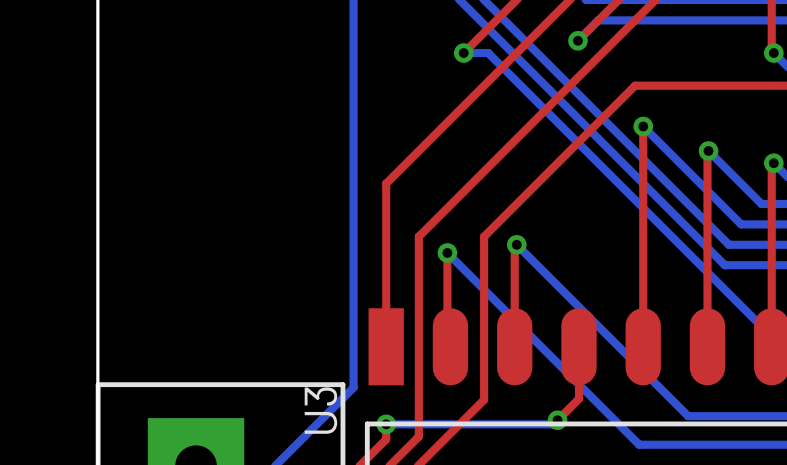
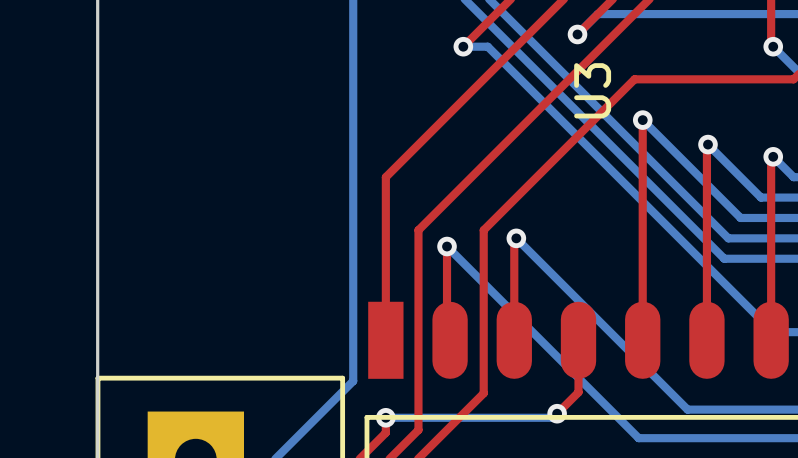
U3 name position: U3 (320, 410) -> U3 (592, 90)

